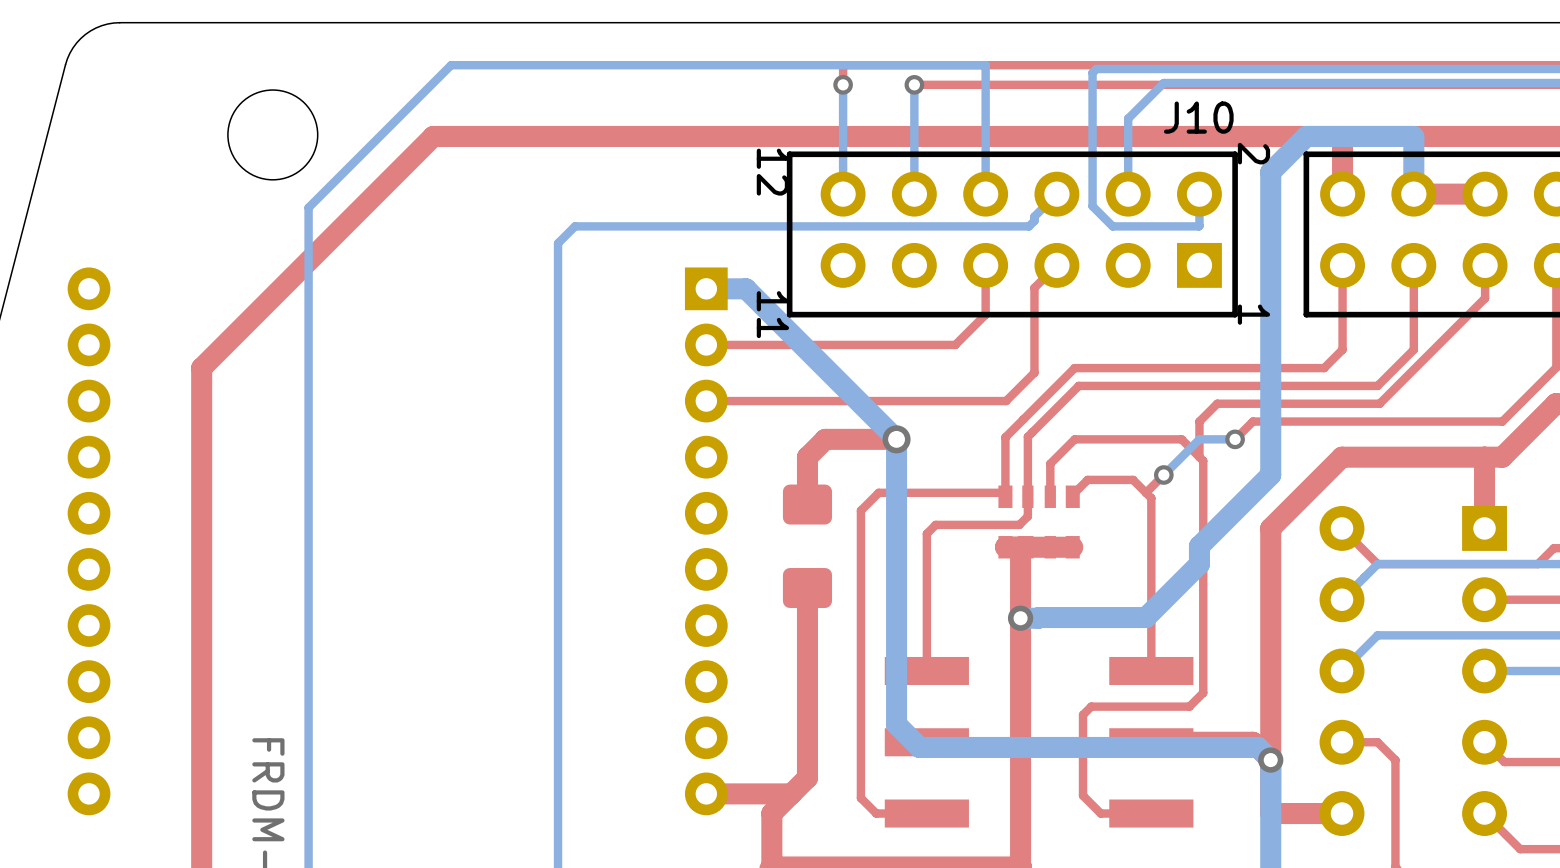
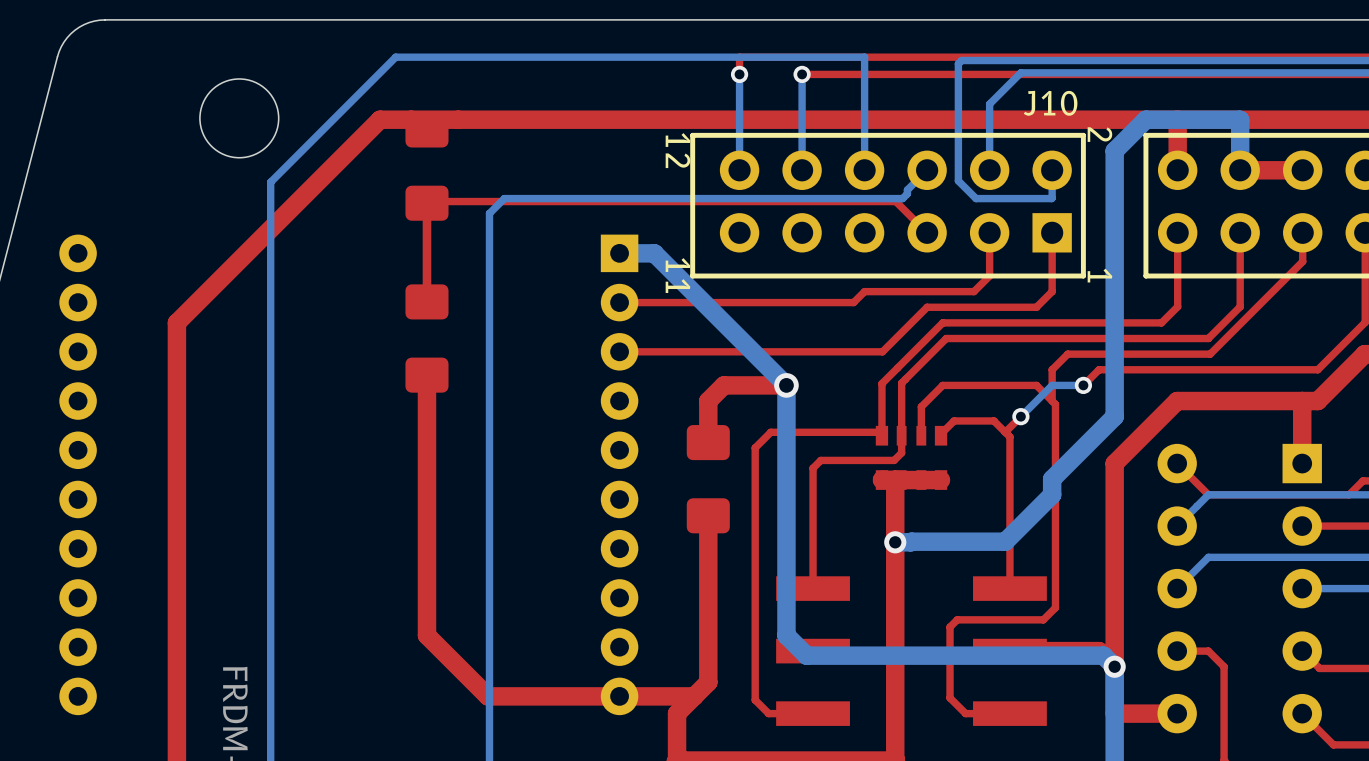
part: none -> (426, 166)
top track: (985, 265) (985, 314) (955, 344) -> (989, 232) (989, 276) (974, 291) (864, 291) (853, 302) (838, 302)
top track: (1056, 265) (1034, 287) (1034, 372) -> (1052, 232) (1052, 291) (1036, 307) (927, 307) (907, 326)
top track: none -> (927, 232) (895, 201) (428, 201) (426, 203) (426, 301)
part: none -> (426, 338)
top track: none -> (426, 375) (426, 635) (487, 696) (619, 696)

